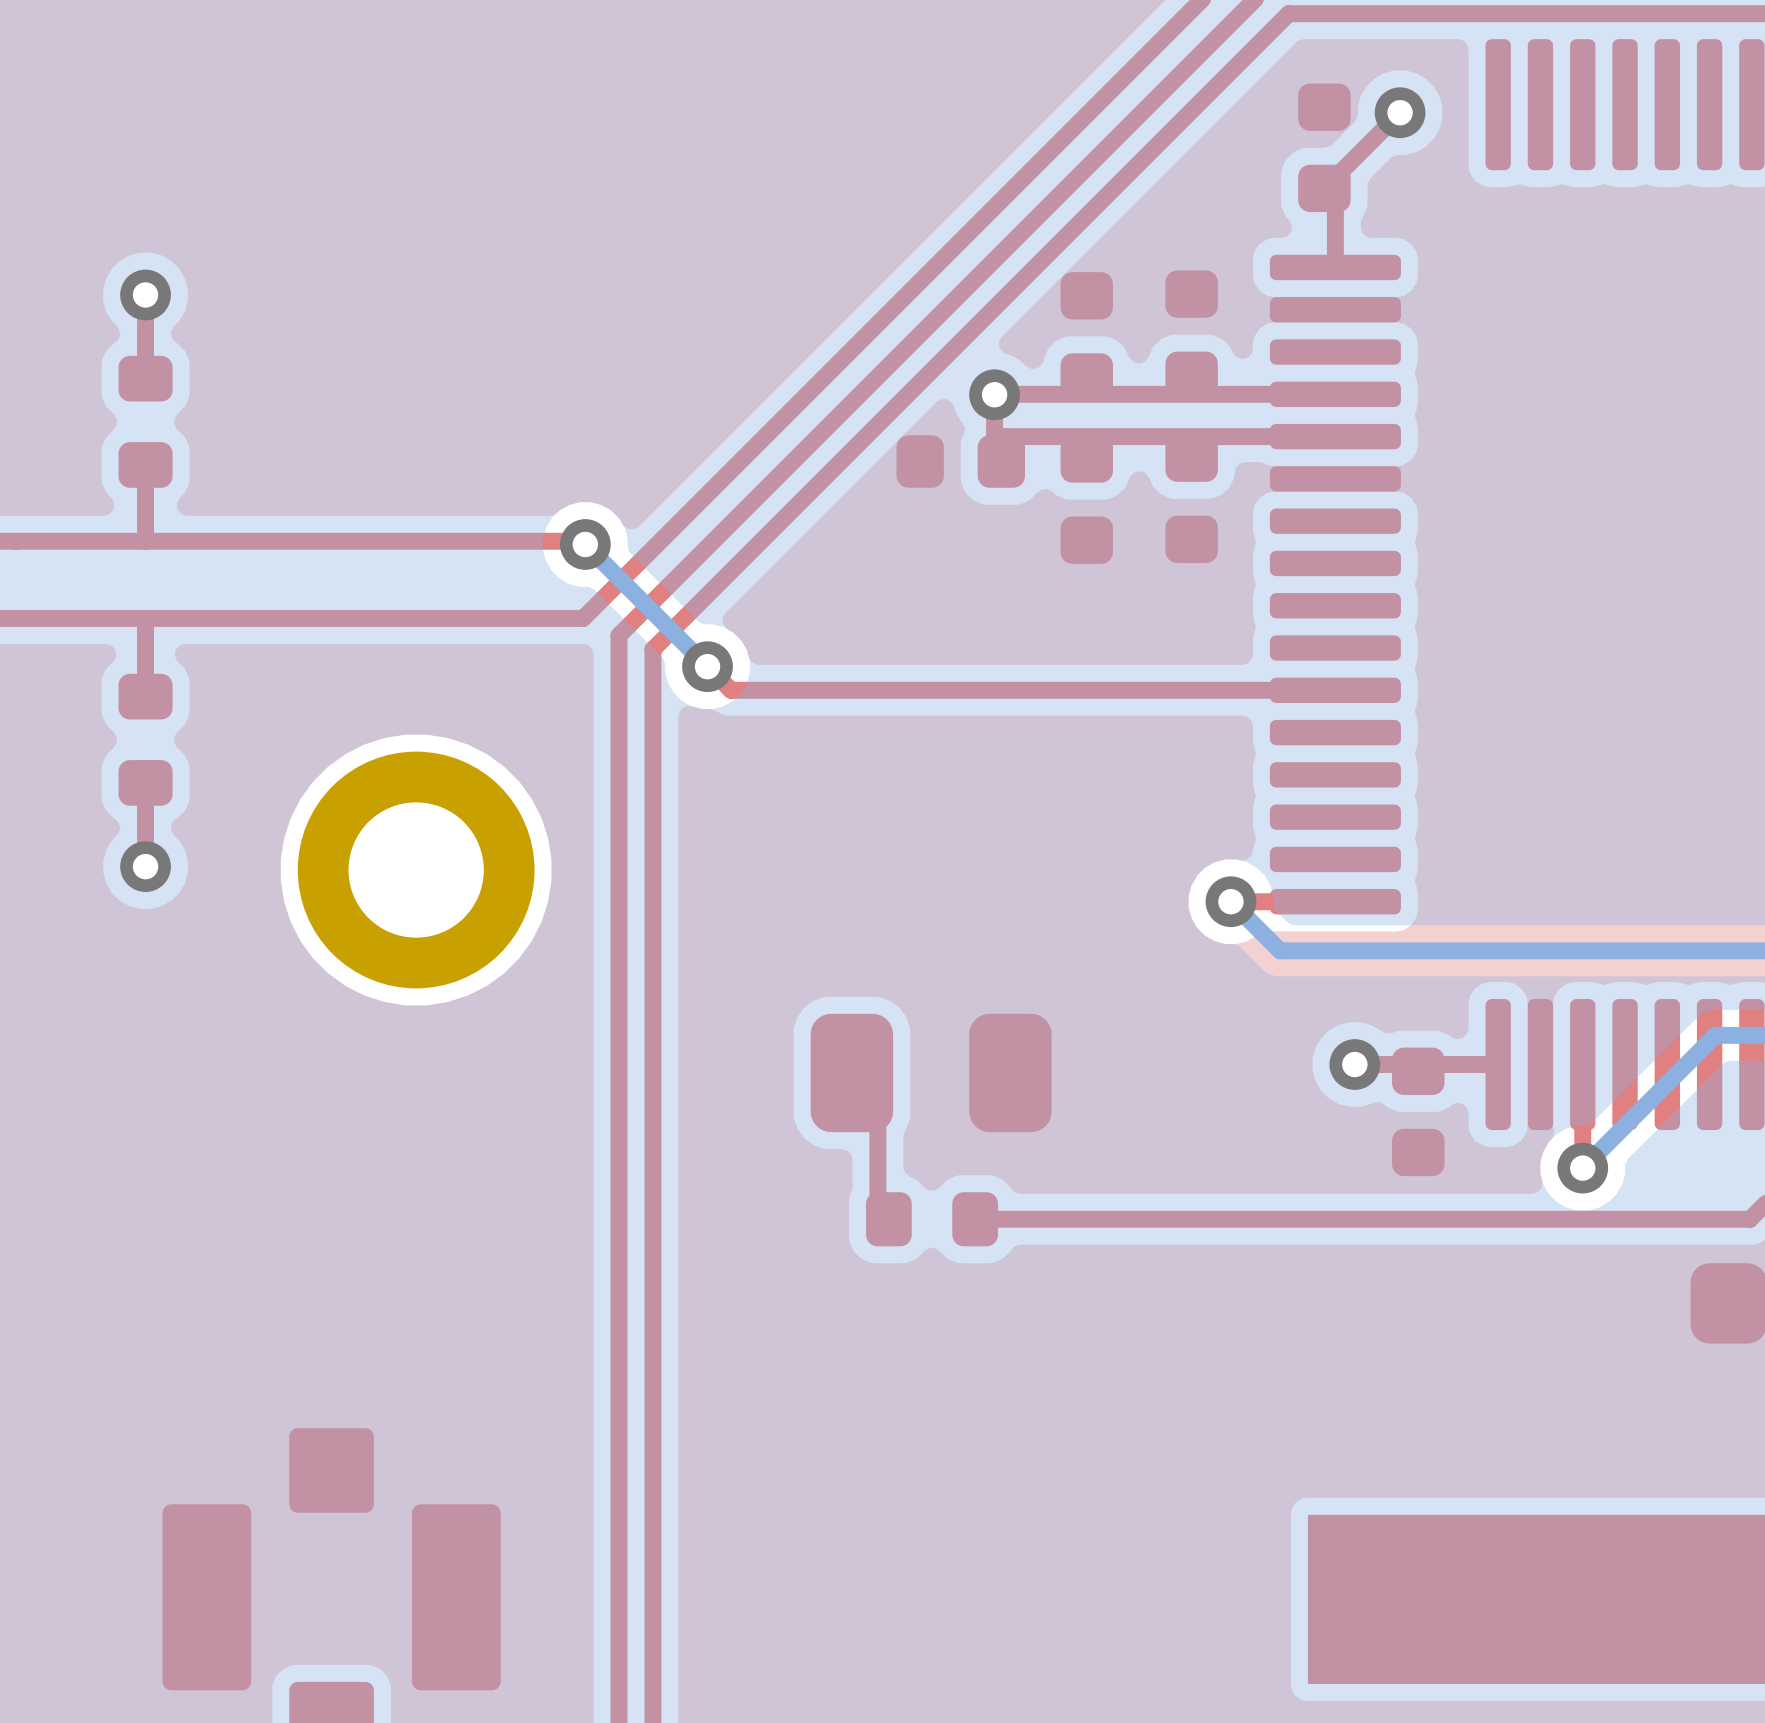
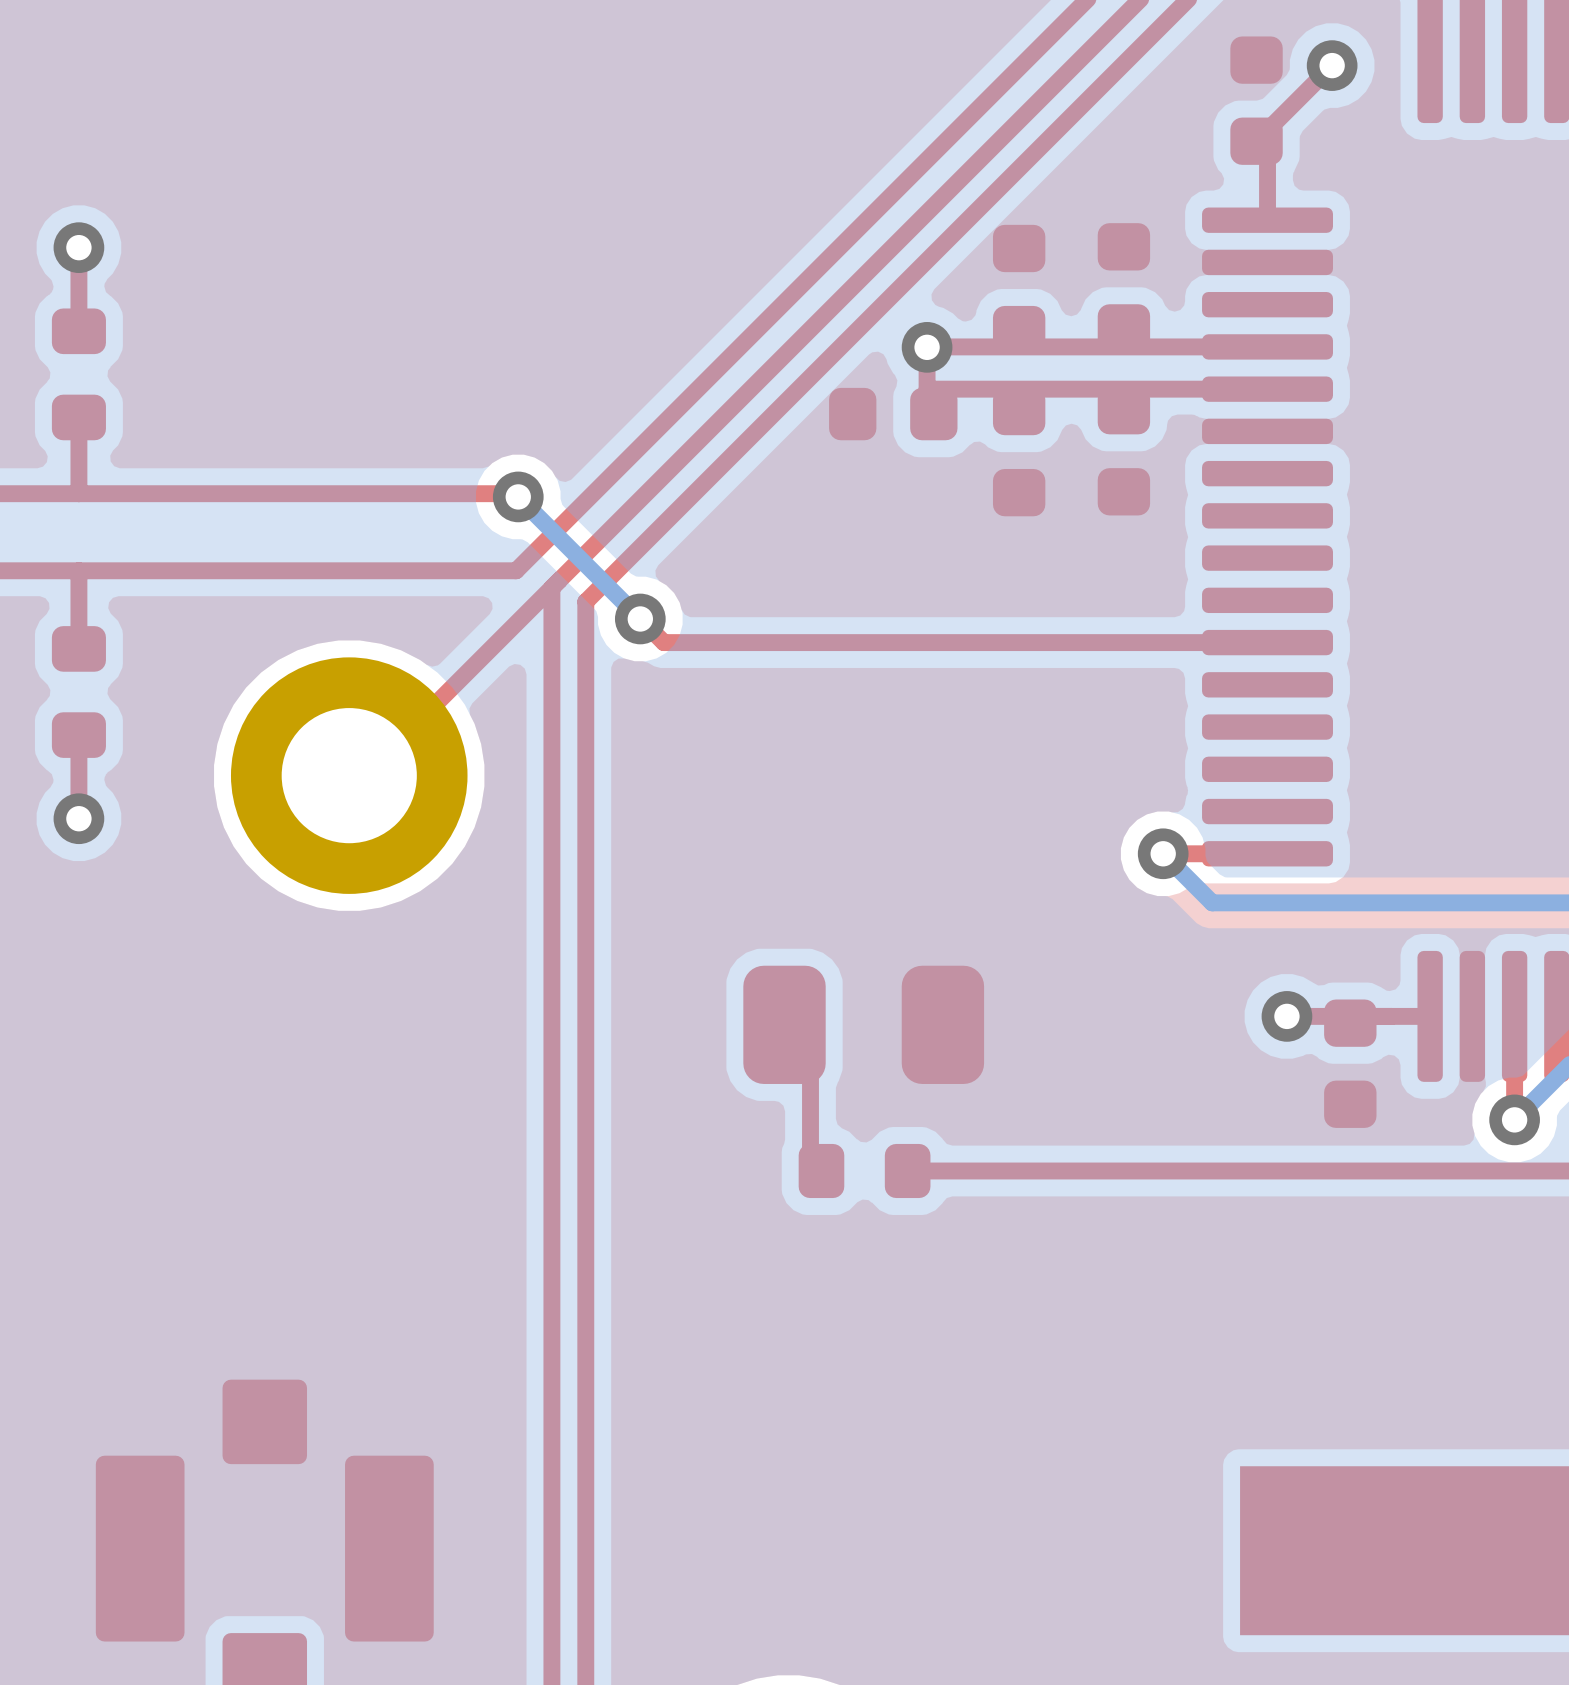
top track: none -> (551, 587) (364, 775) (349, 775)
part position: (416, 870) -> (349, 775)

